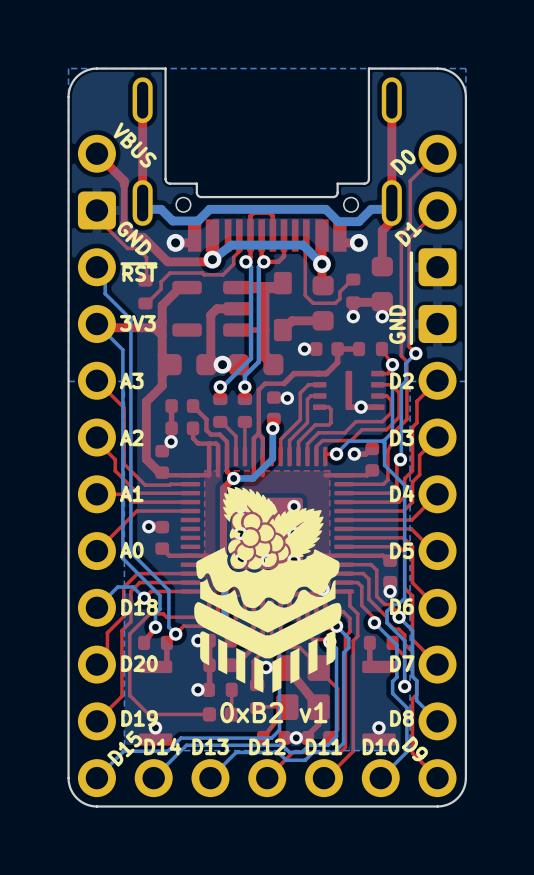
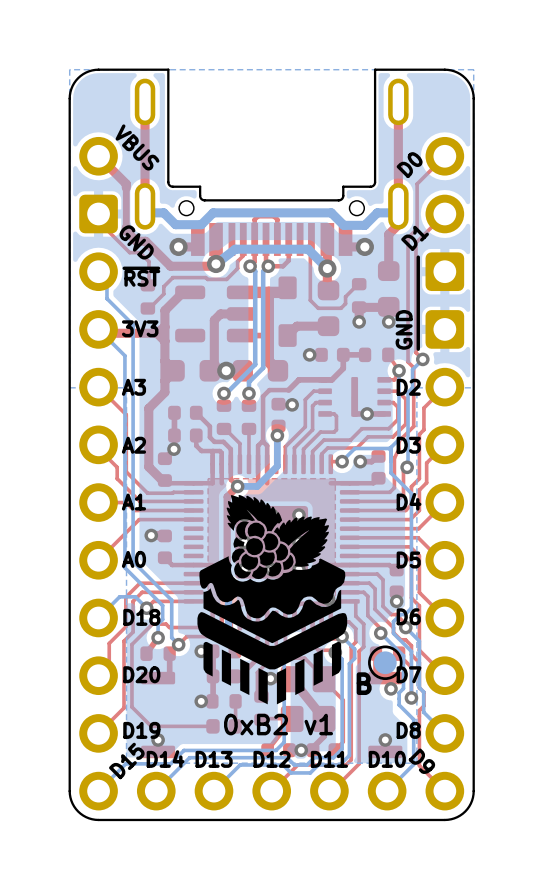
part: none -> (385, 662)
via: none -> (390, 688)

